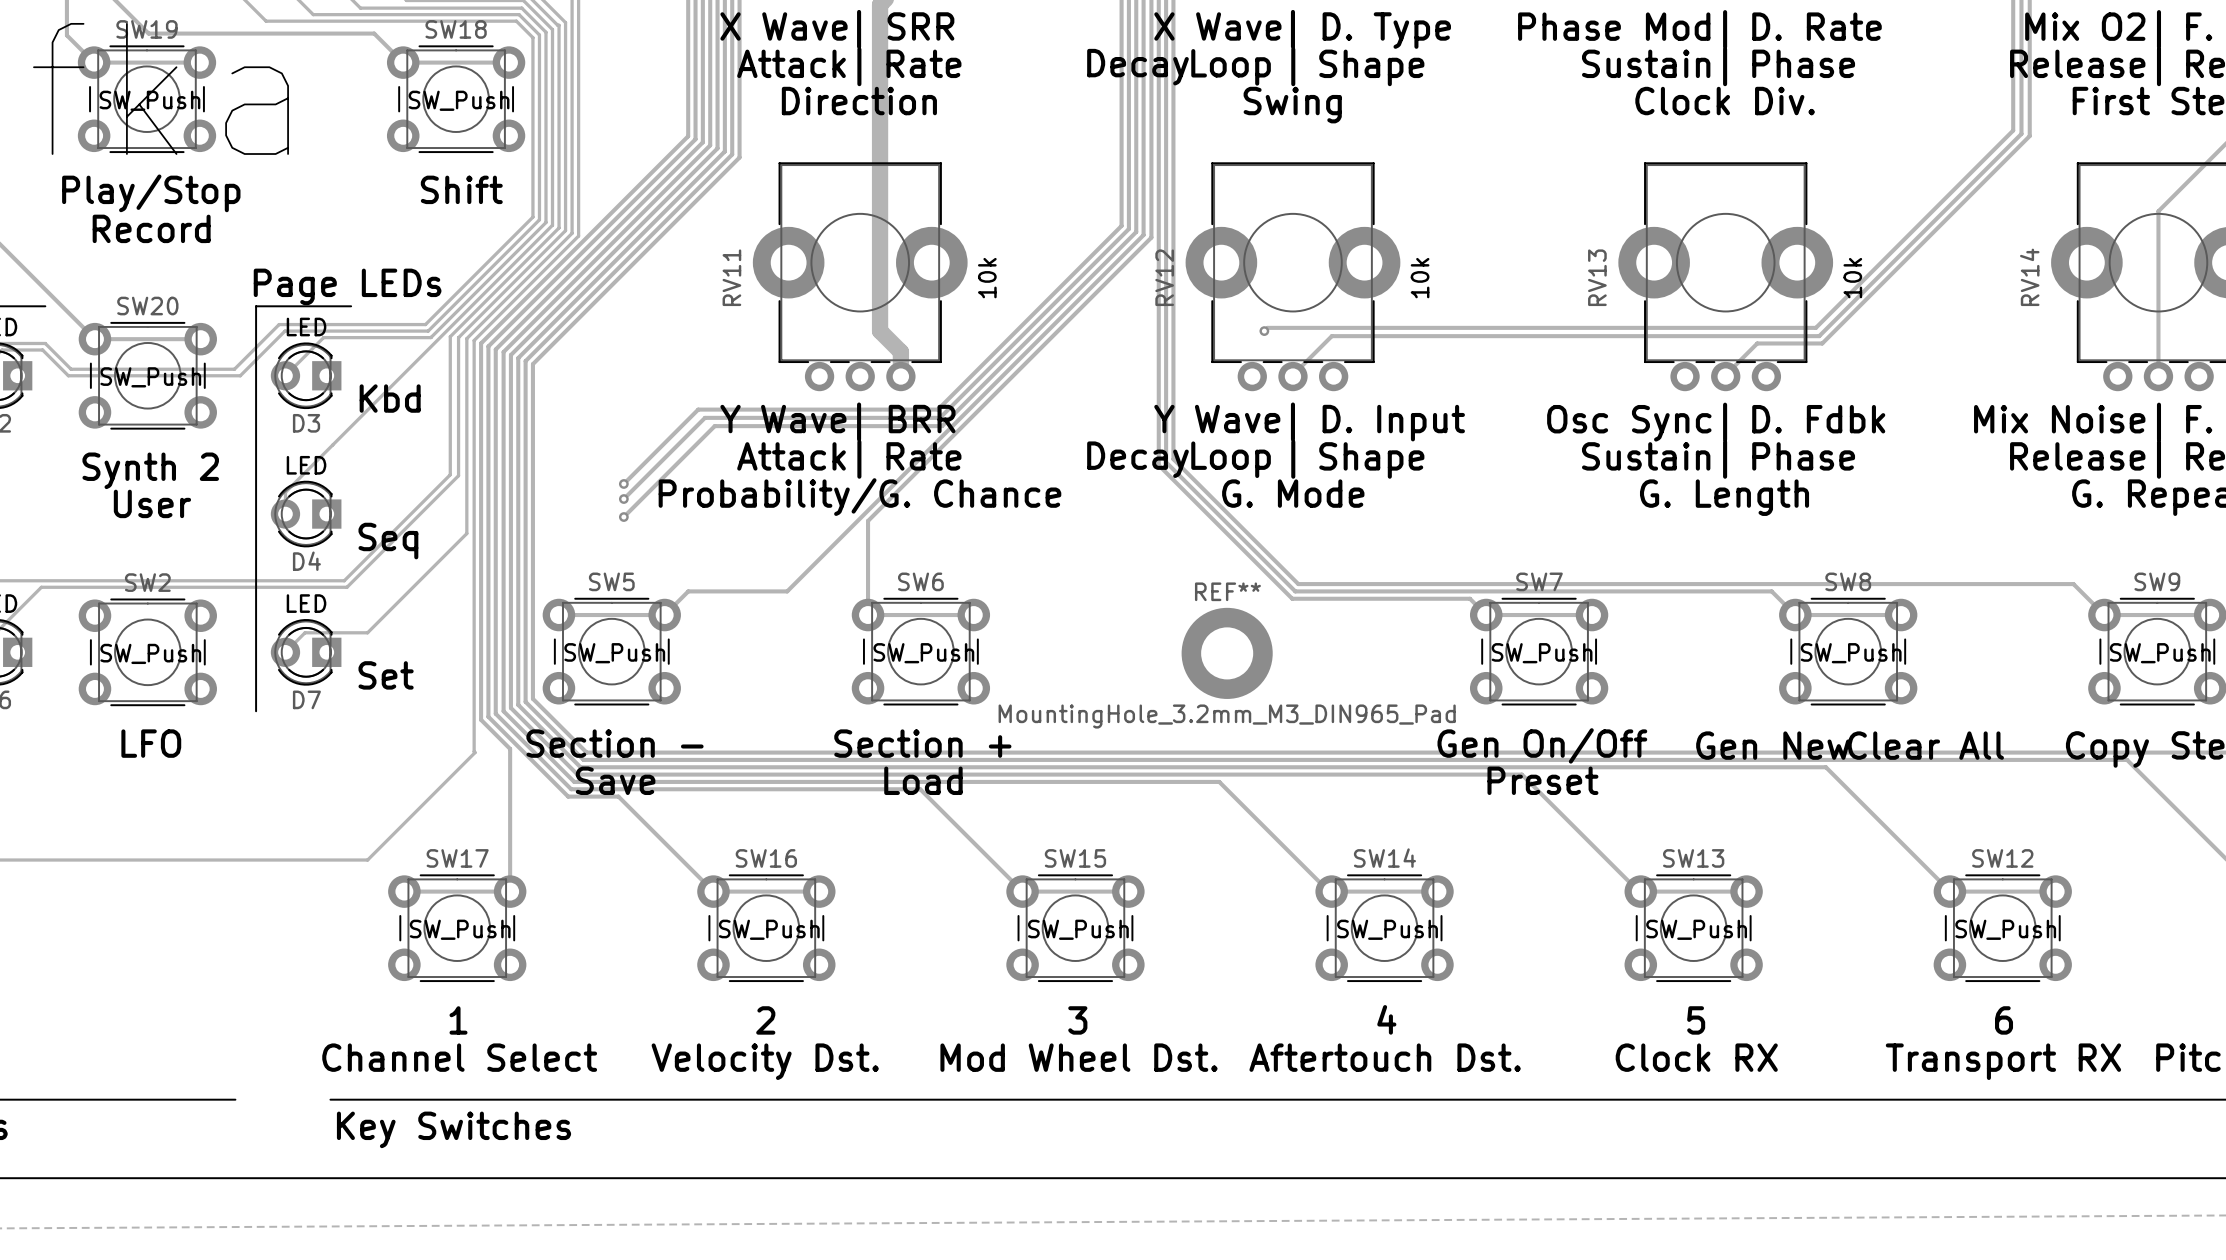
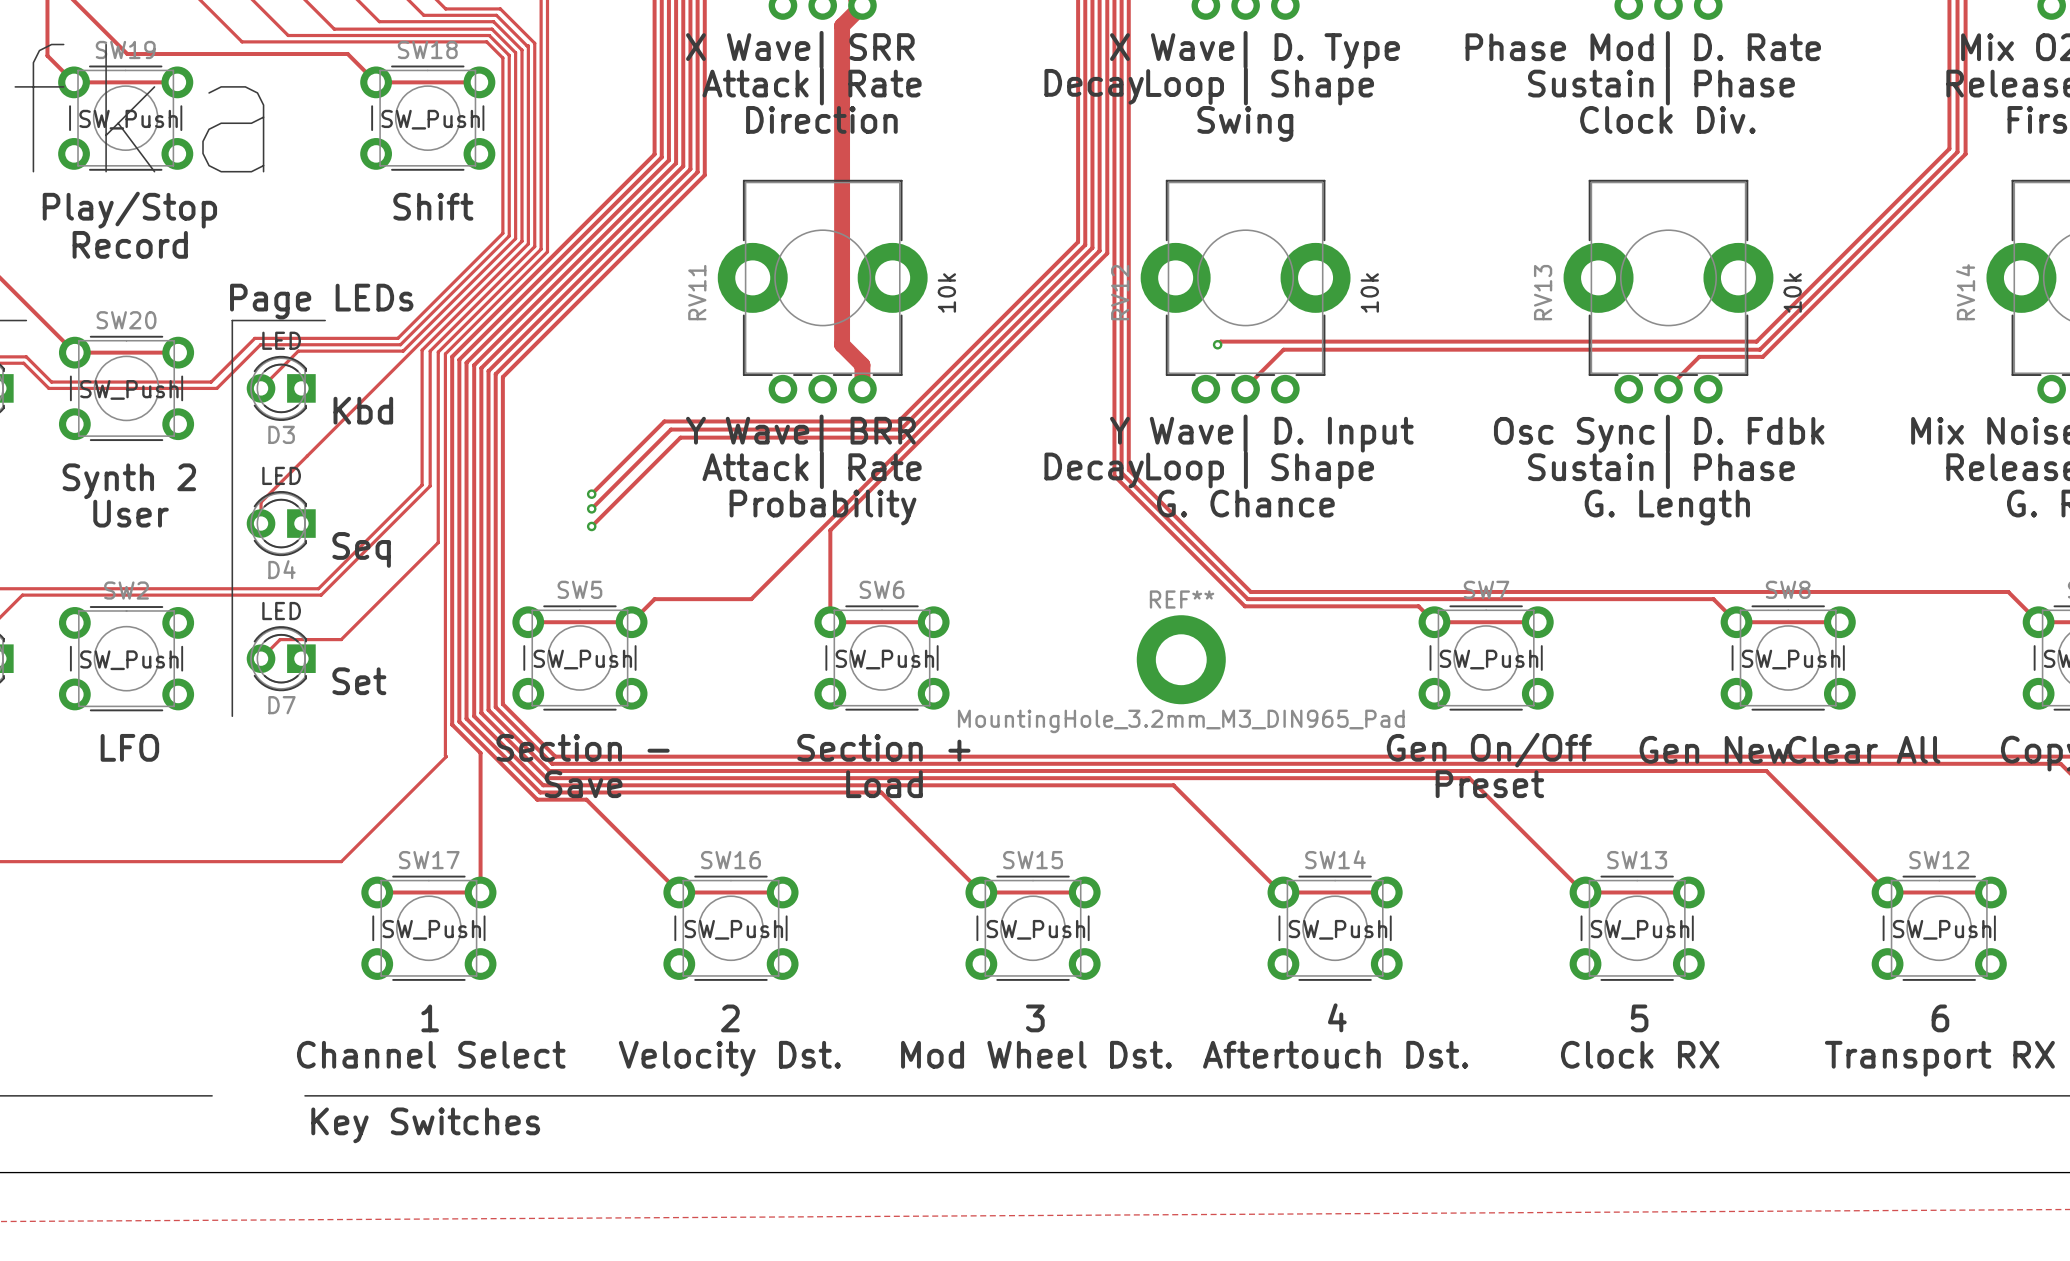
text: G. Mode (1293, 493) -> G. Chance (1245, 503)
text: Probability/G. Chance (859, 497) -> Probability (823, 507)

